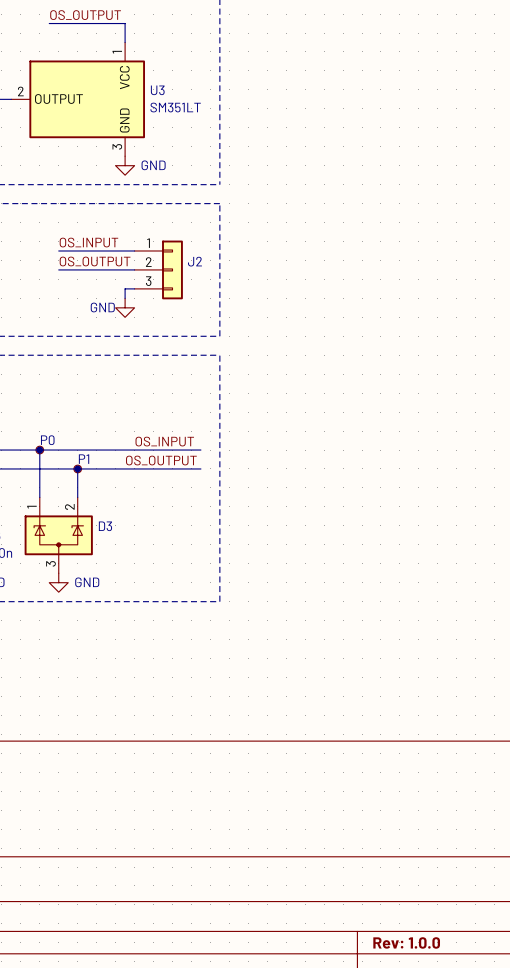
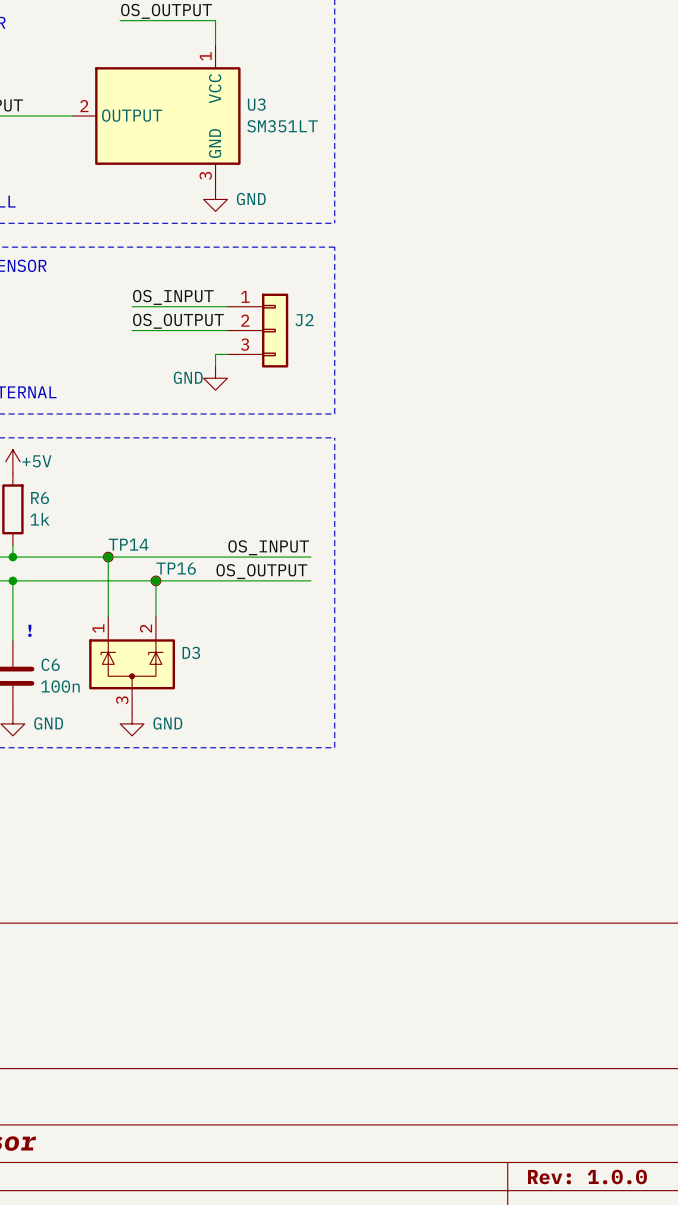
TP14 value: P0 (47, 440) -> none
TP14 name: none -> TP14 (128, 544)
TP16 value: P1 (84, 459) -> none
TP16 name: none -> TP16 (176, 568)

